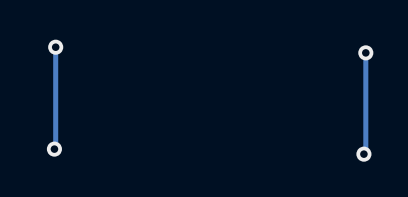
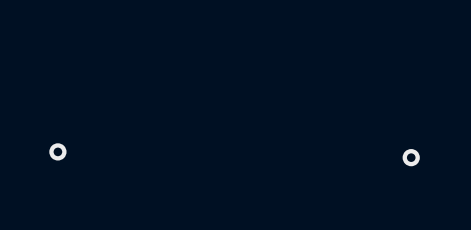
track: (55, 47) (55, 147) -> none
via: (55, 47) -> none
track: (365, 52) (365, 152) -> none
via: (365, 52) -> none

